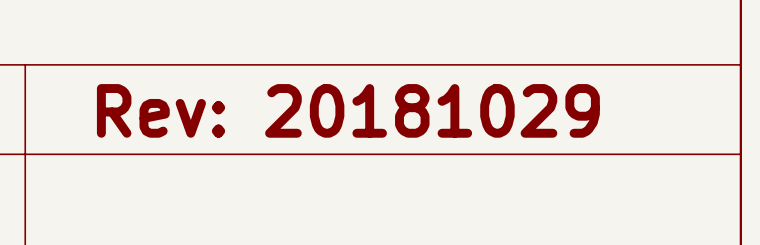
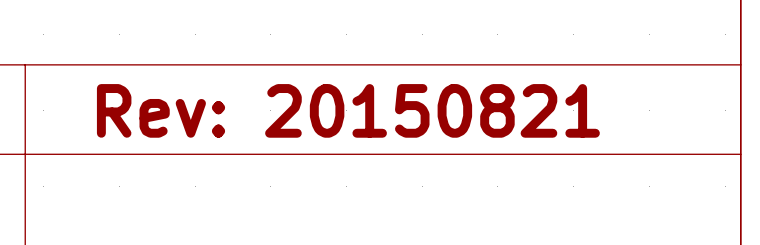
title block: Rev: 20181029 (348, 110) -> Rev: 20150821 (348, 110)

